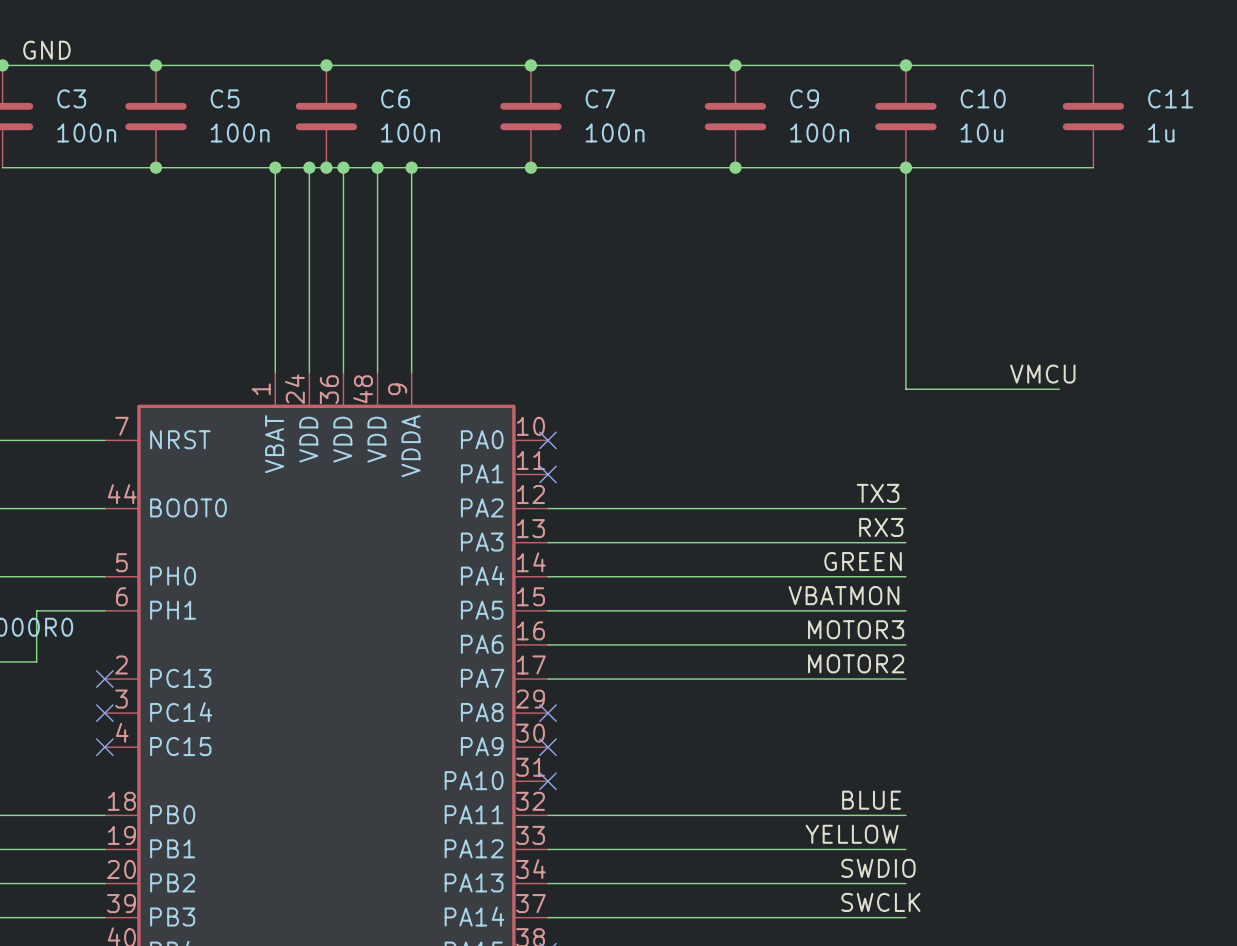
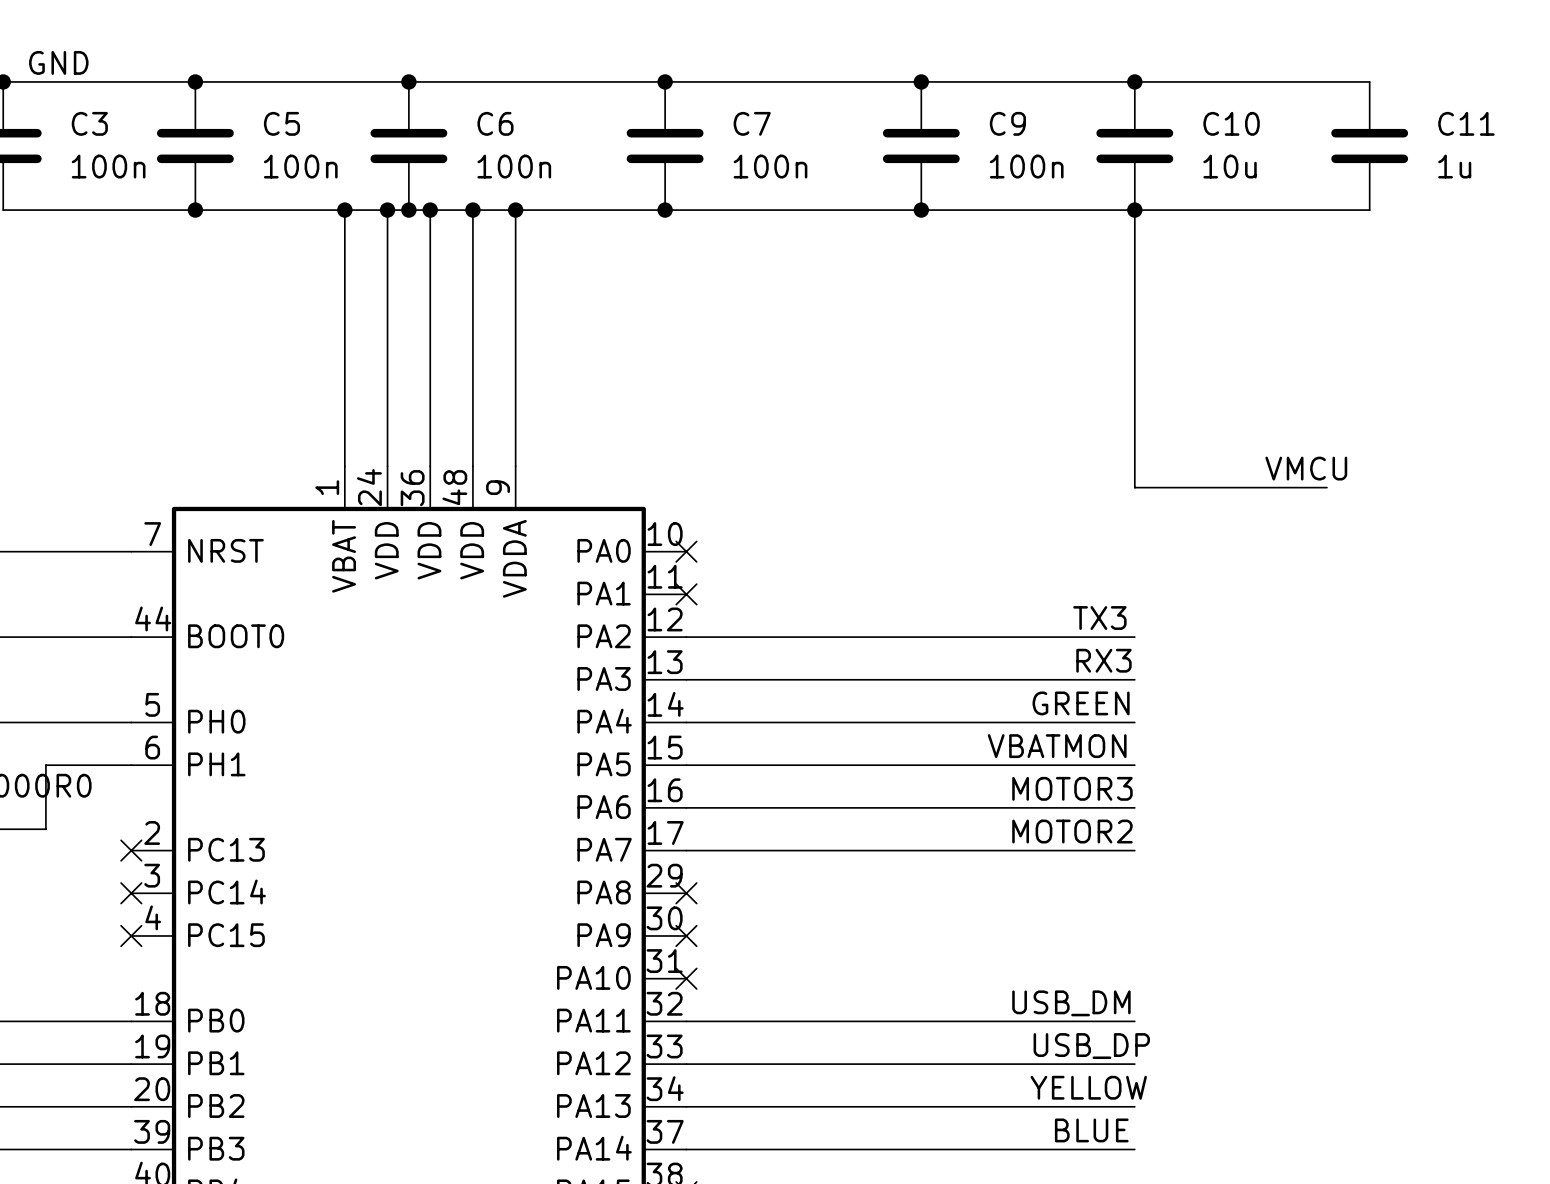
label: none -> USB_DM (1071, 1003)
label: BLUE (871, 800) -> none
label position: YELLOW (852, 834) -> YELLOW (1088, 1087)
label: none -> USB_DP (1091, 1046)
label: SWDIO (878, 868) -> none
label: SWCLK (880, 902) -> BLUE (1091, 1130)

